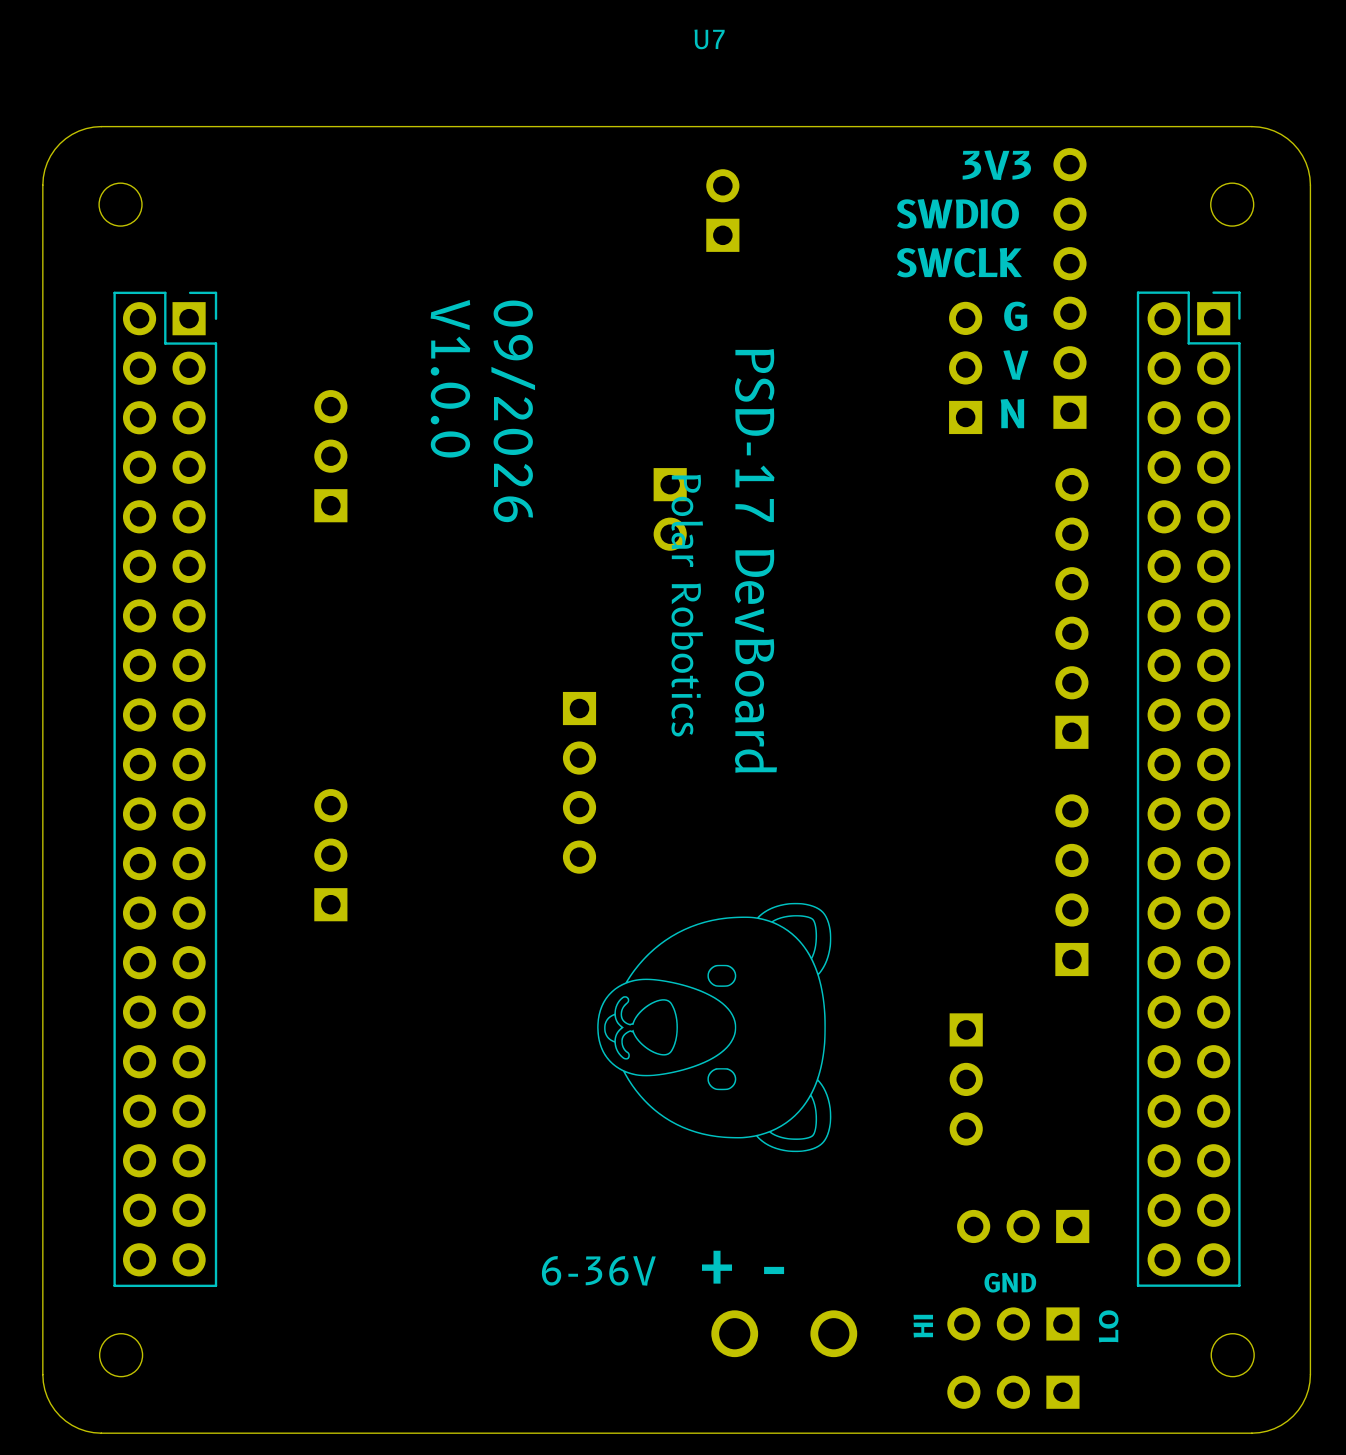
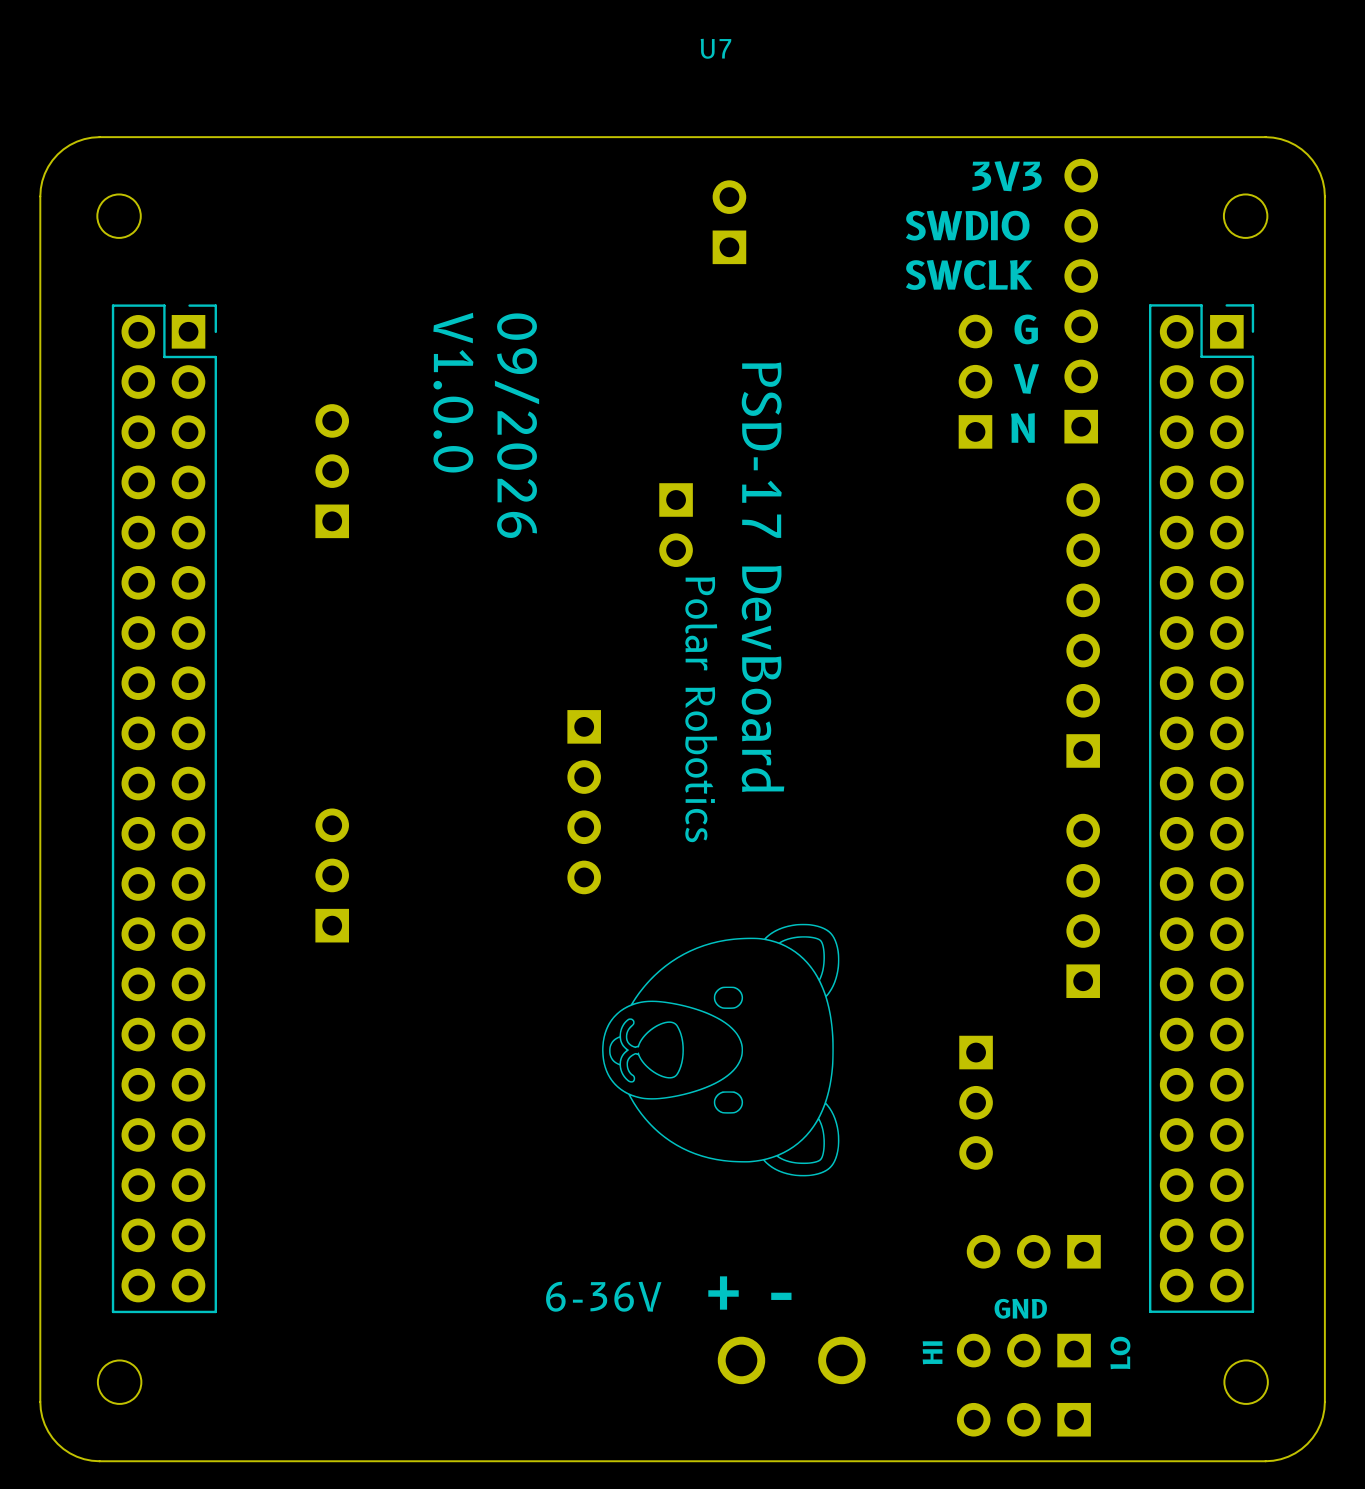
text position: Polar Robotics (687, 605) -> Polar Robotics (701, 709)

